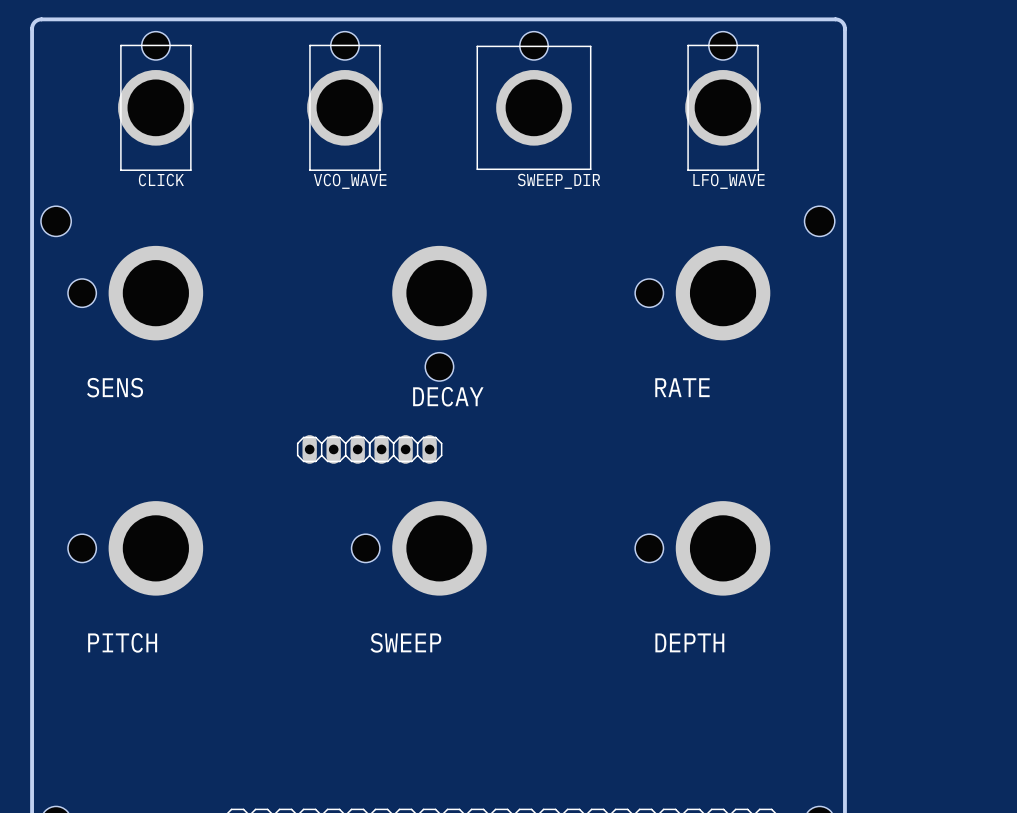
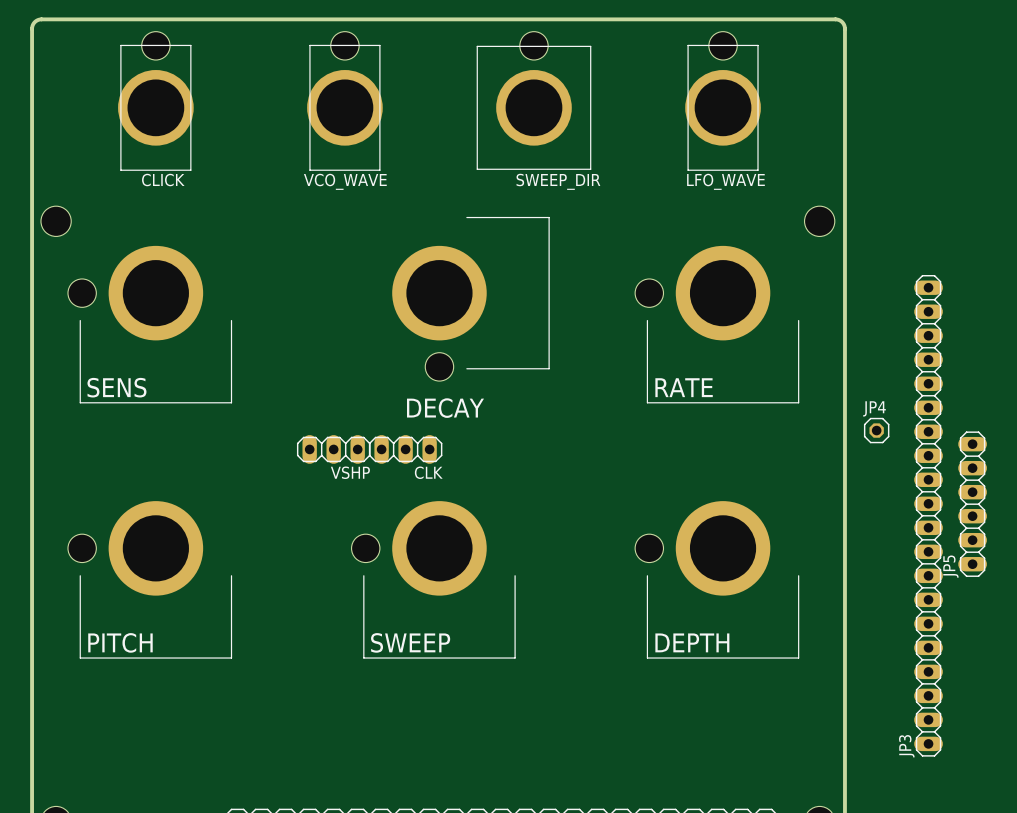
DECAY: none -> (470, 298)
DECAY: (439, 313) -> none
SENS: none -> (150, 324)
RATE: none -> (717, 324)
JP4: none -> (876, 430)
VSHP name: none -> VSHP (350, 472)
CLK name: none -> CLK (428, 472)
JP5: none -> (972, 504)
JP3: none -> (928, 515)
PITCH: none -> (150, 579)
SWEEP: none -> (433, 579)
DEPTH: none -> (717, 579)

